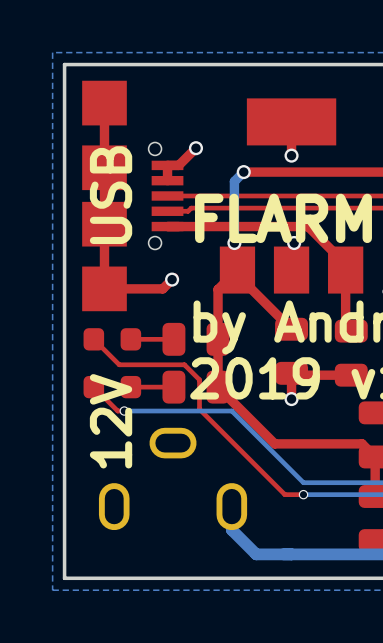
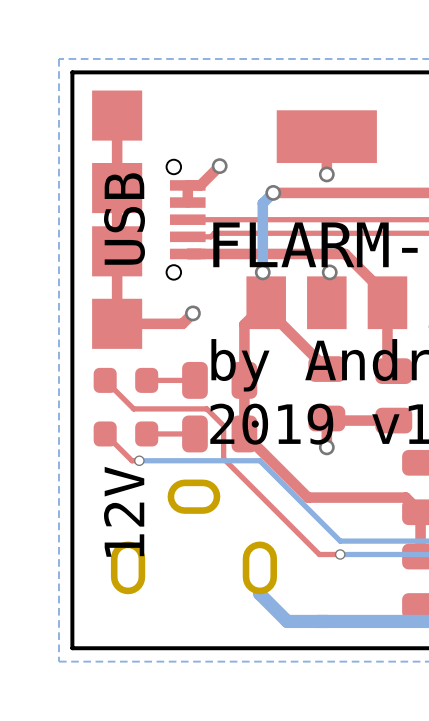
text position: 12V (111, 421) -> 12V (124, 511)

